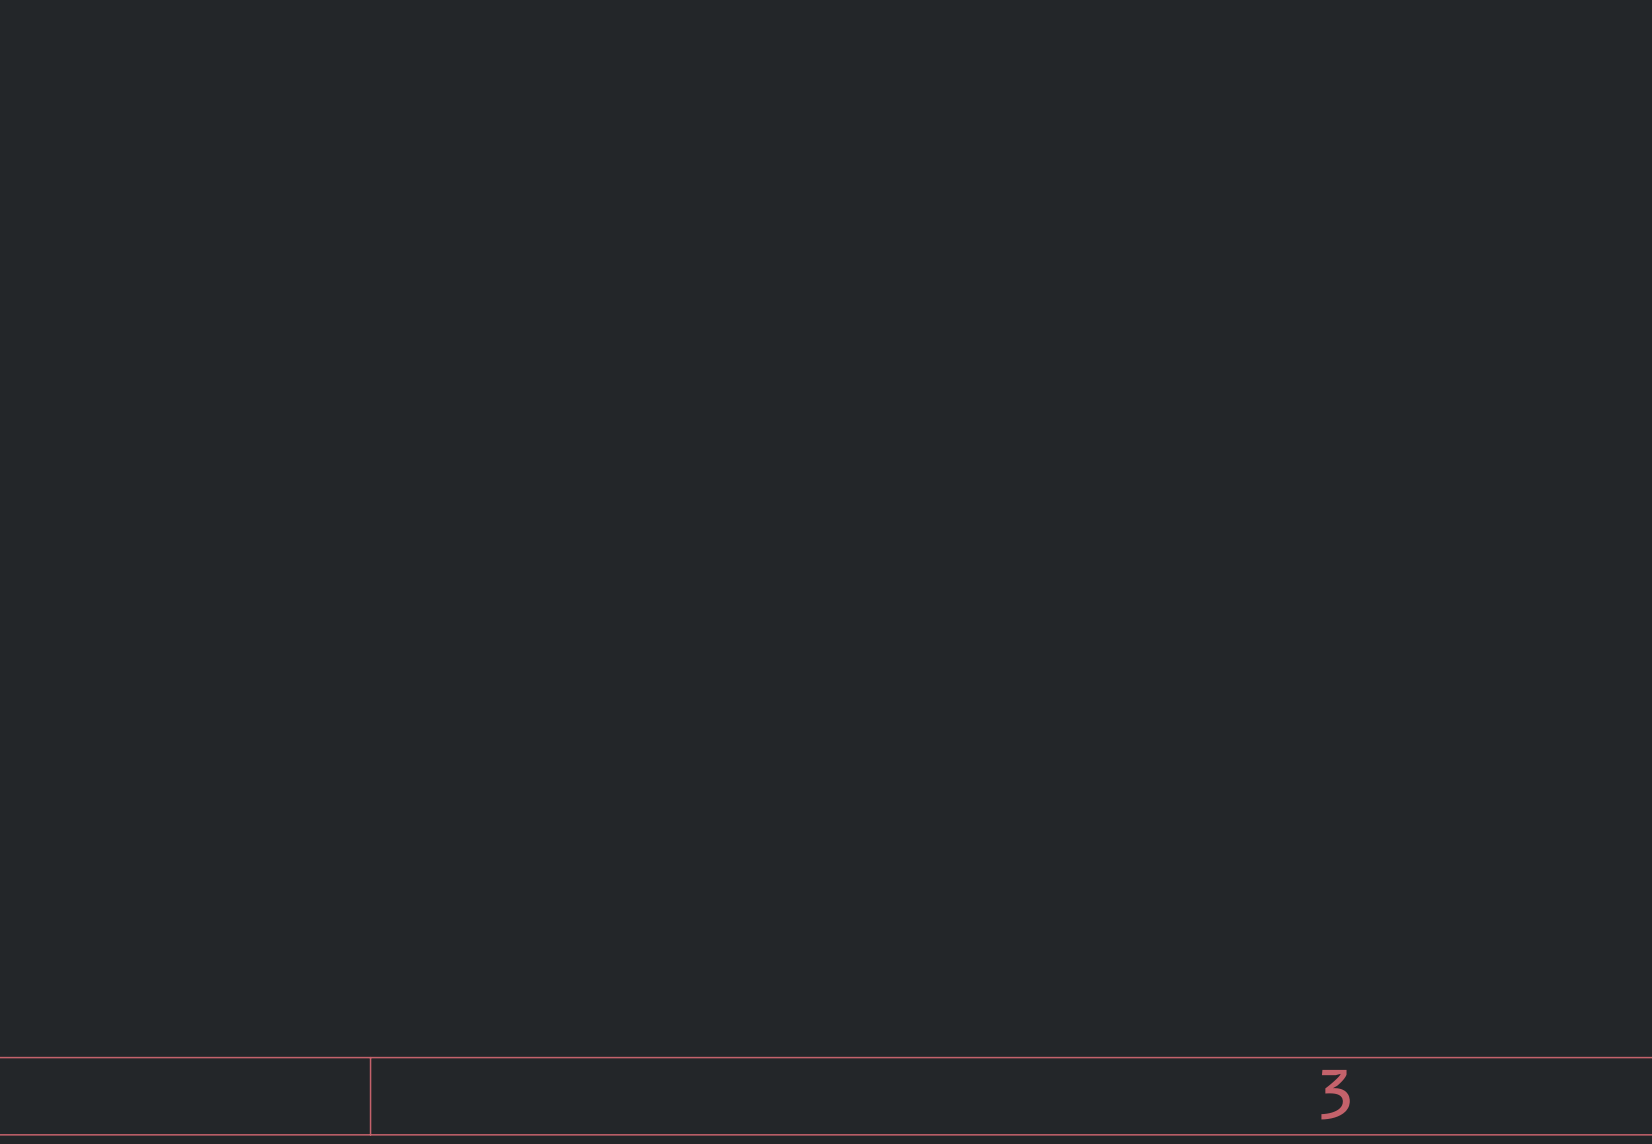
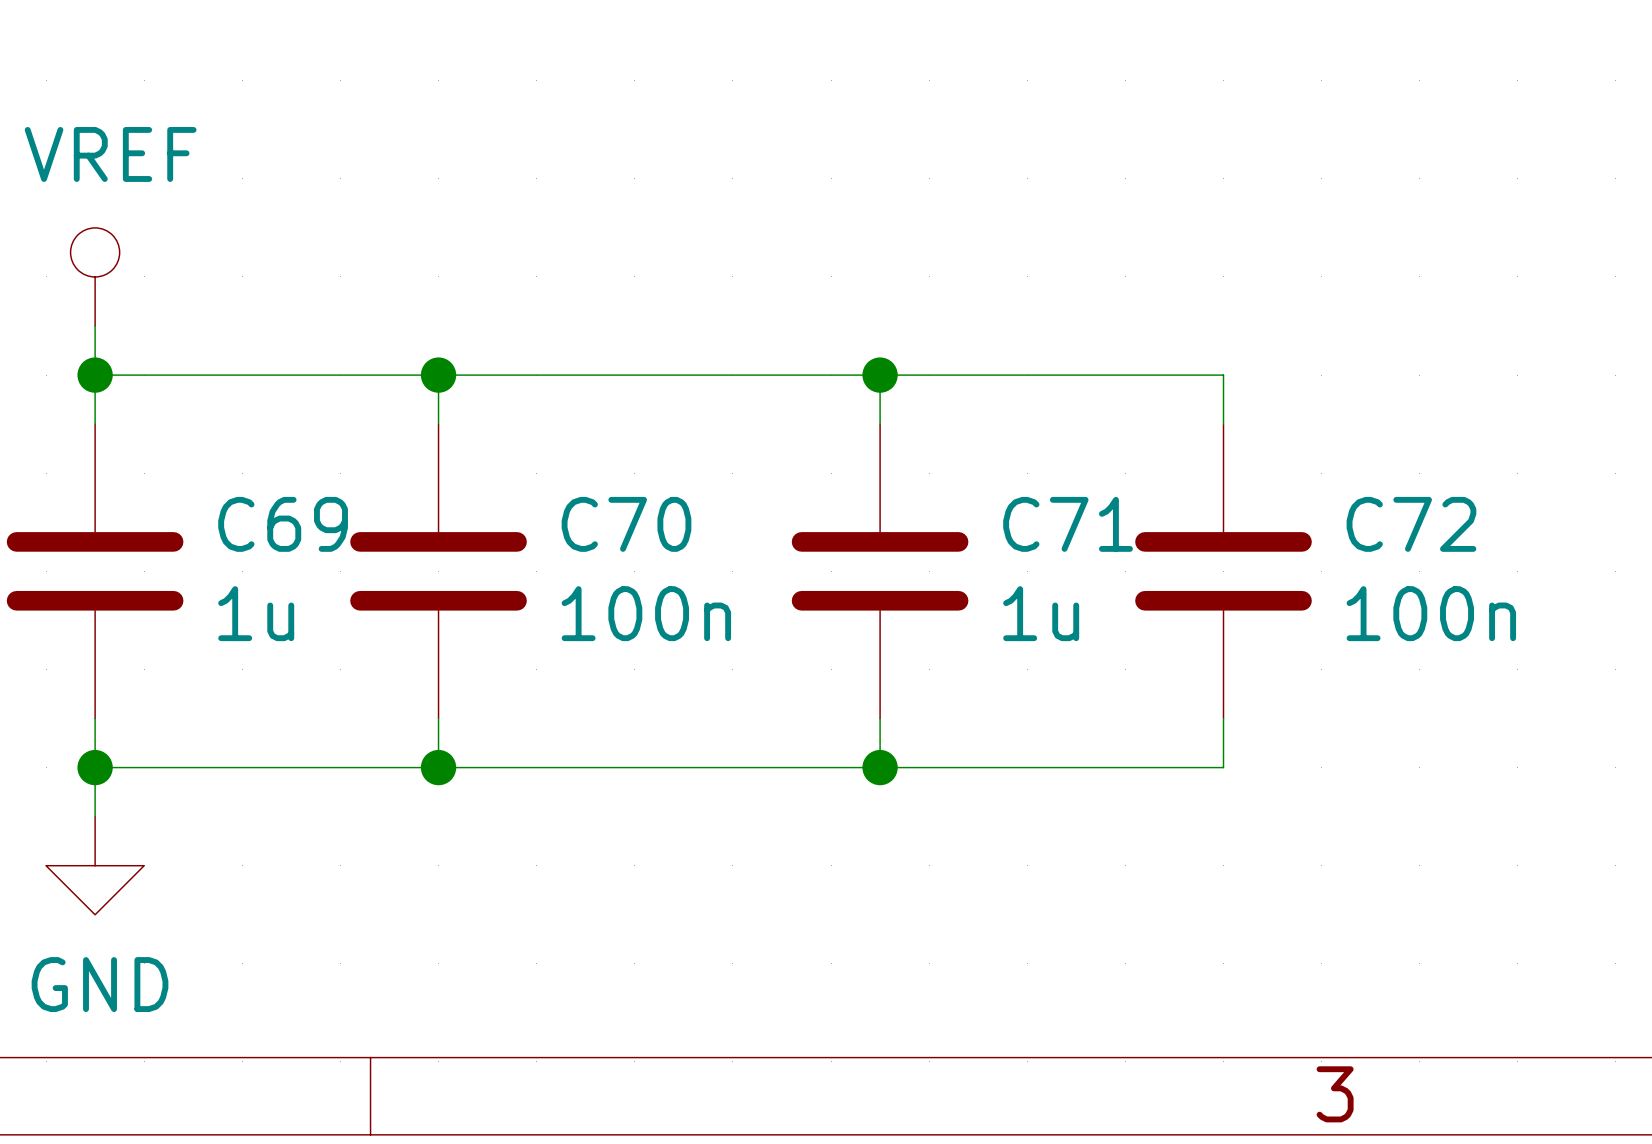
power symbol: none -> VREF (95, 276)
wire: none -> (95, 326) (95, 424)
wire: none -> (95, 375) (1223, 375) (1223, 424)
junction: none -> (95, 375)
wire: none -> (438, 375) (438, 424)
junction: none -> (438, 375)
wire: none -> (880, 375) (880, 424)
junction: none -> (880, 375)
C69: none -> 1u (95, 571)
C70: none -> 100n (438, 571)
C71: none -> 1u (880, 571)
C72: none -> 100n (1223, 571)
wire: none -> (95, 718) (95, 816)
wire: none -> (438, 718) (438, 767)
wire: none -> (880, 718) (880, 767)
wire: none -> (1223, 718) (1223, 767) (95, 767)
junction: none -> (95, 767)
junction: none -> (438, 767)
junction: none -> (880, 767)
power symbol: none -> GND (95, 865)

